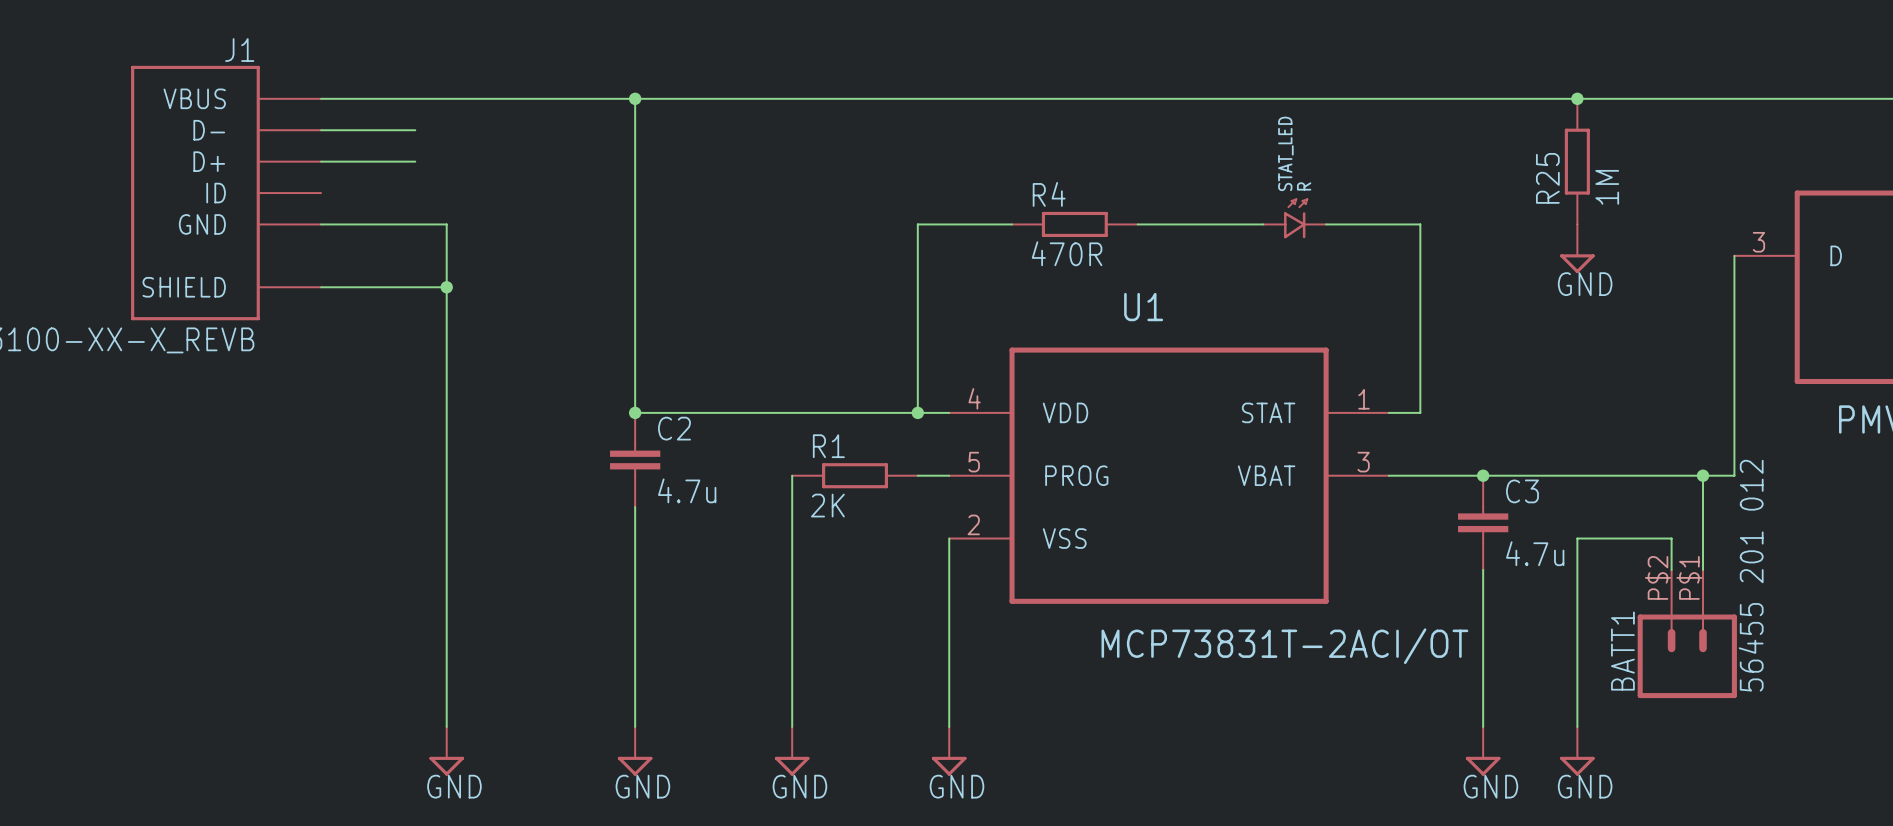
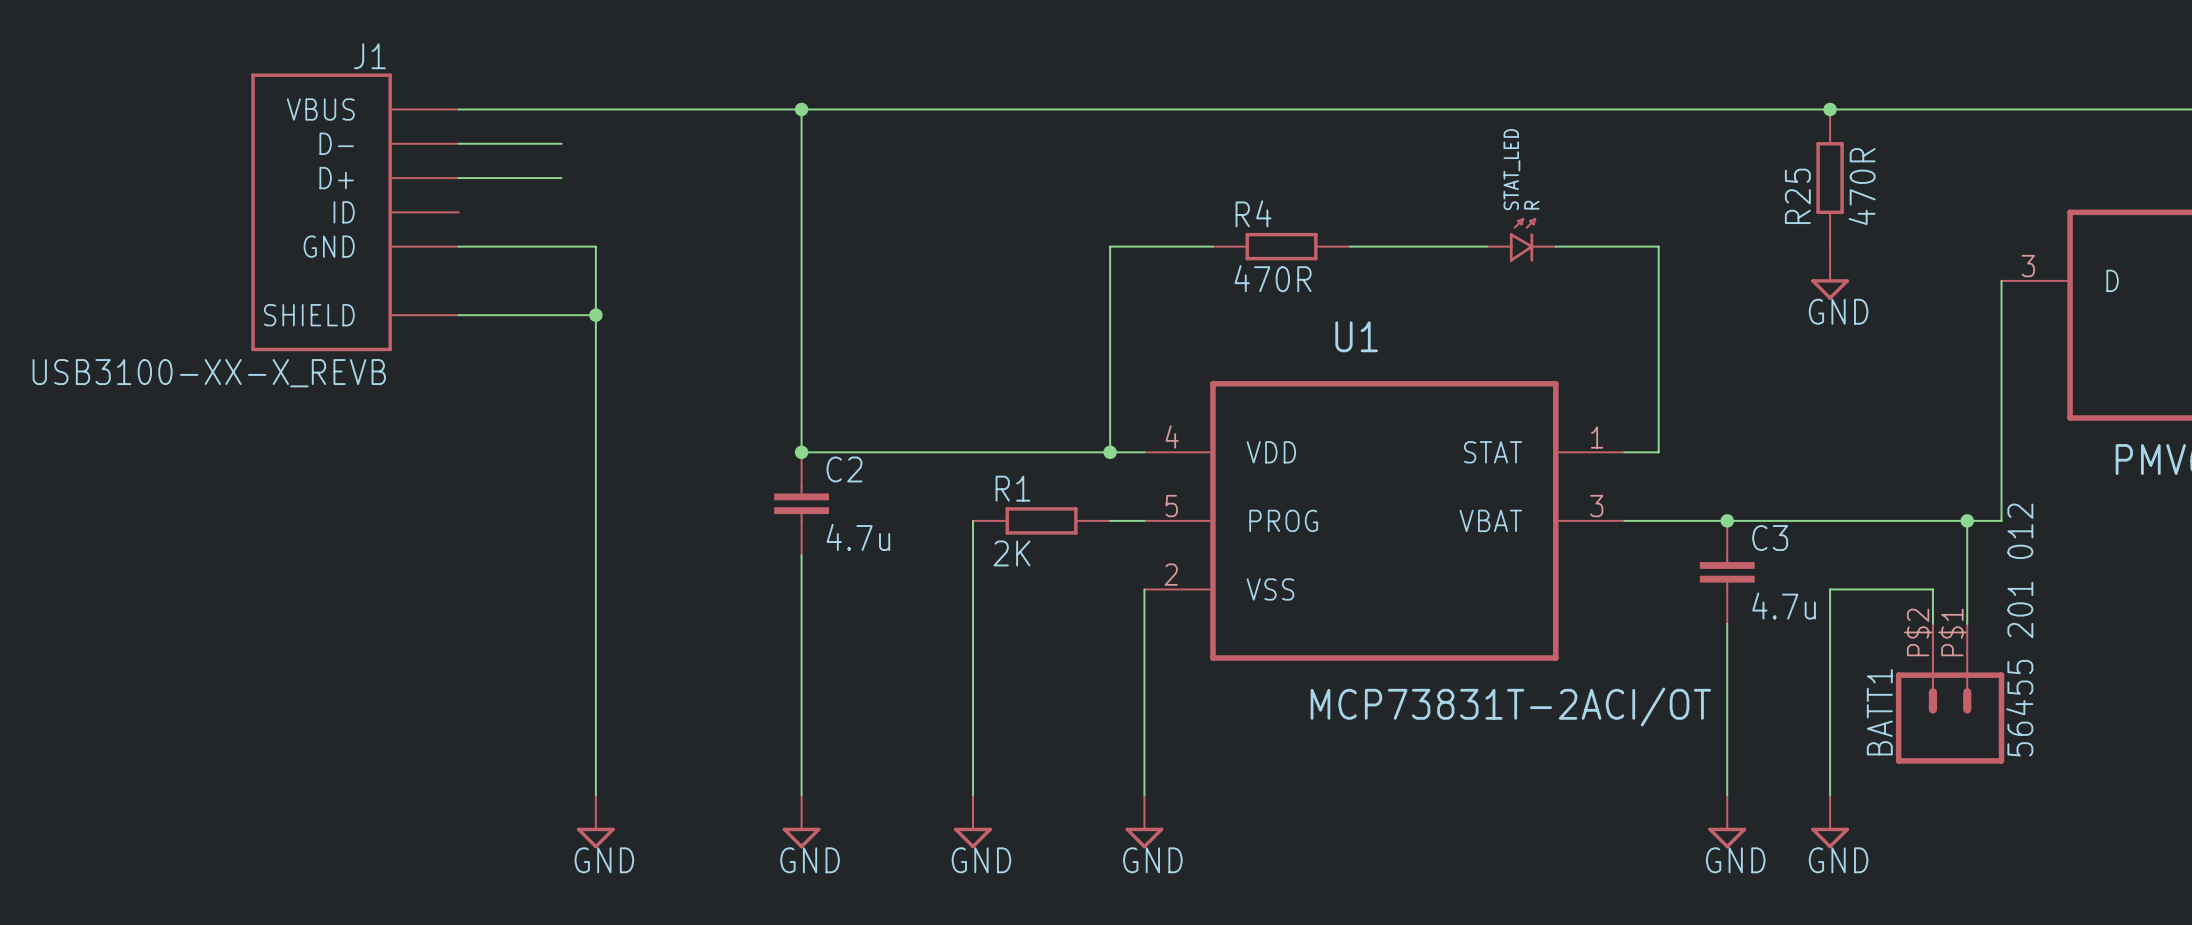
R25 value: 1M (1607, 187) -> 470R (1862, 186)

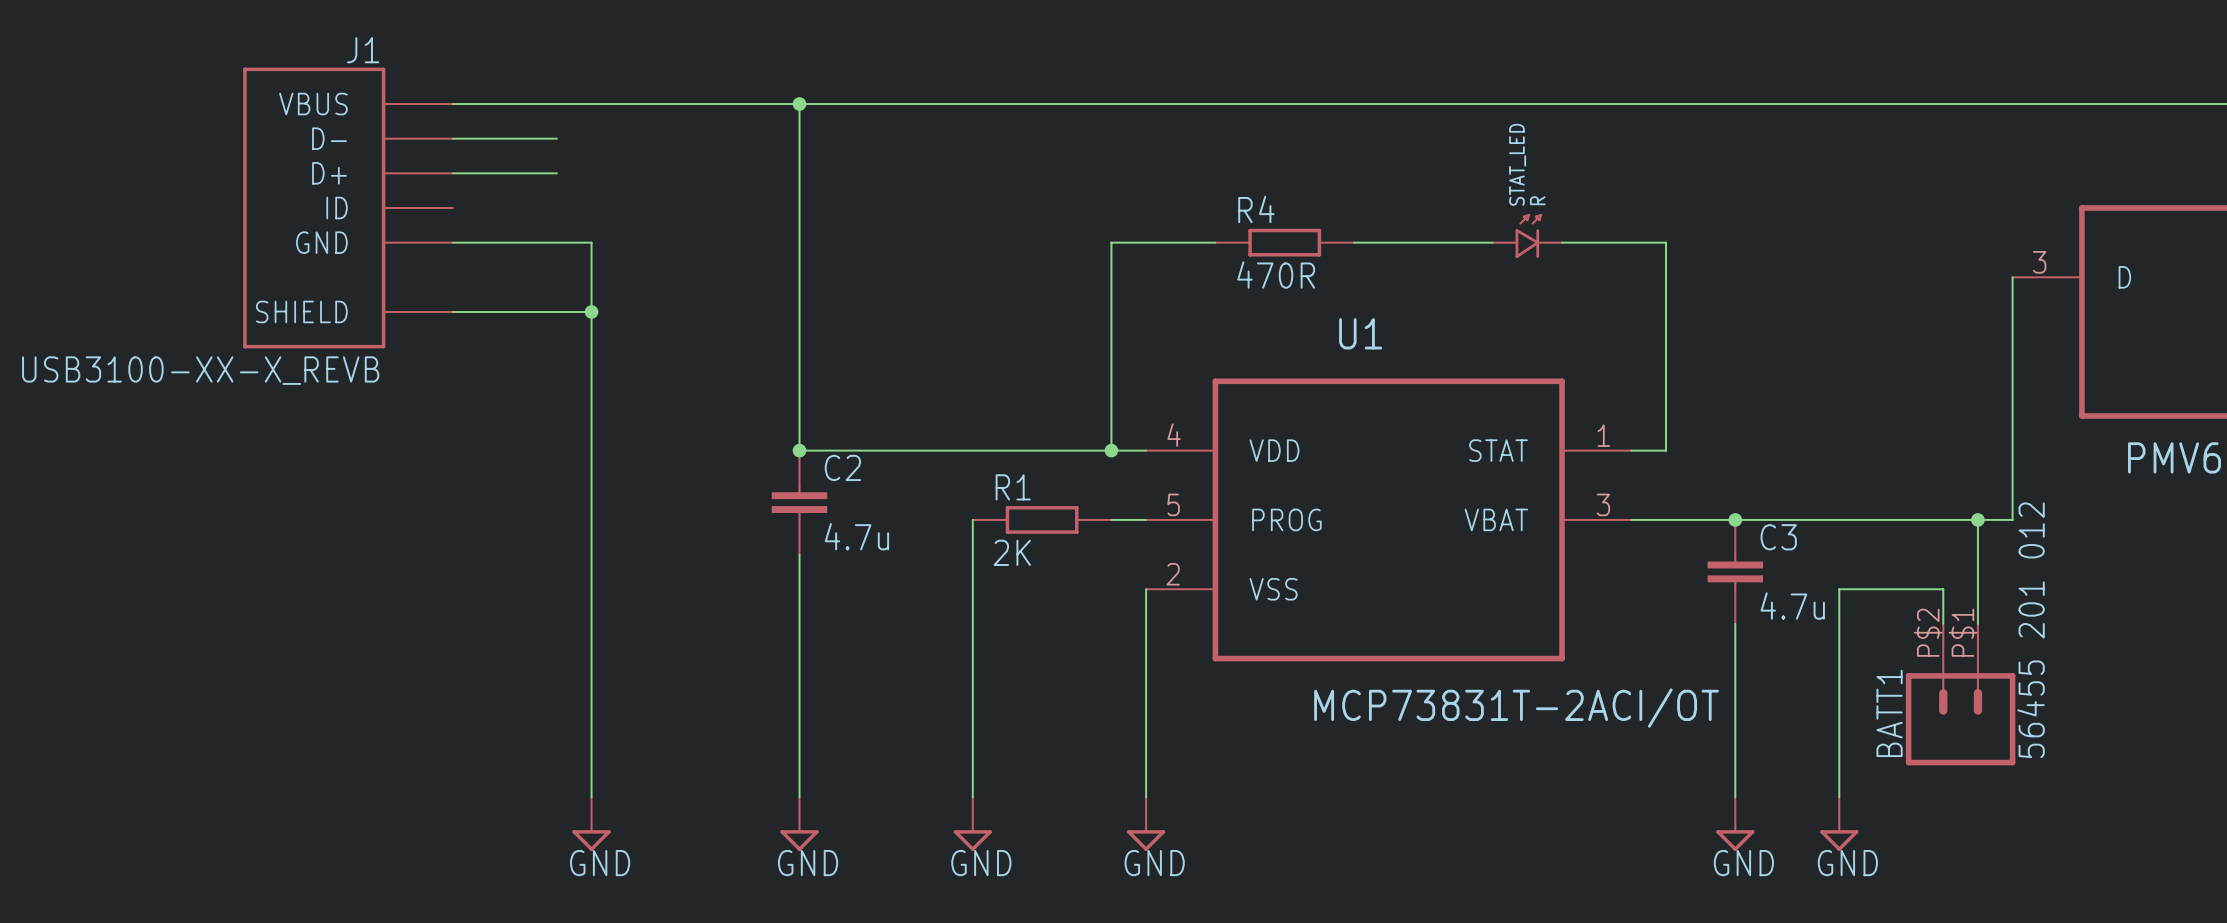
junction: (1830, 109) -> none
R25: 470R (1830, 178) -> none
power symbol: GND (1830, 273) -> none

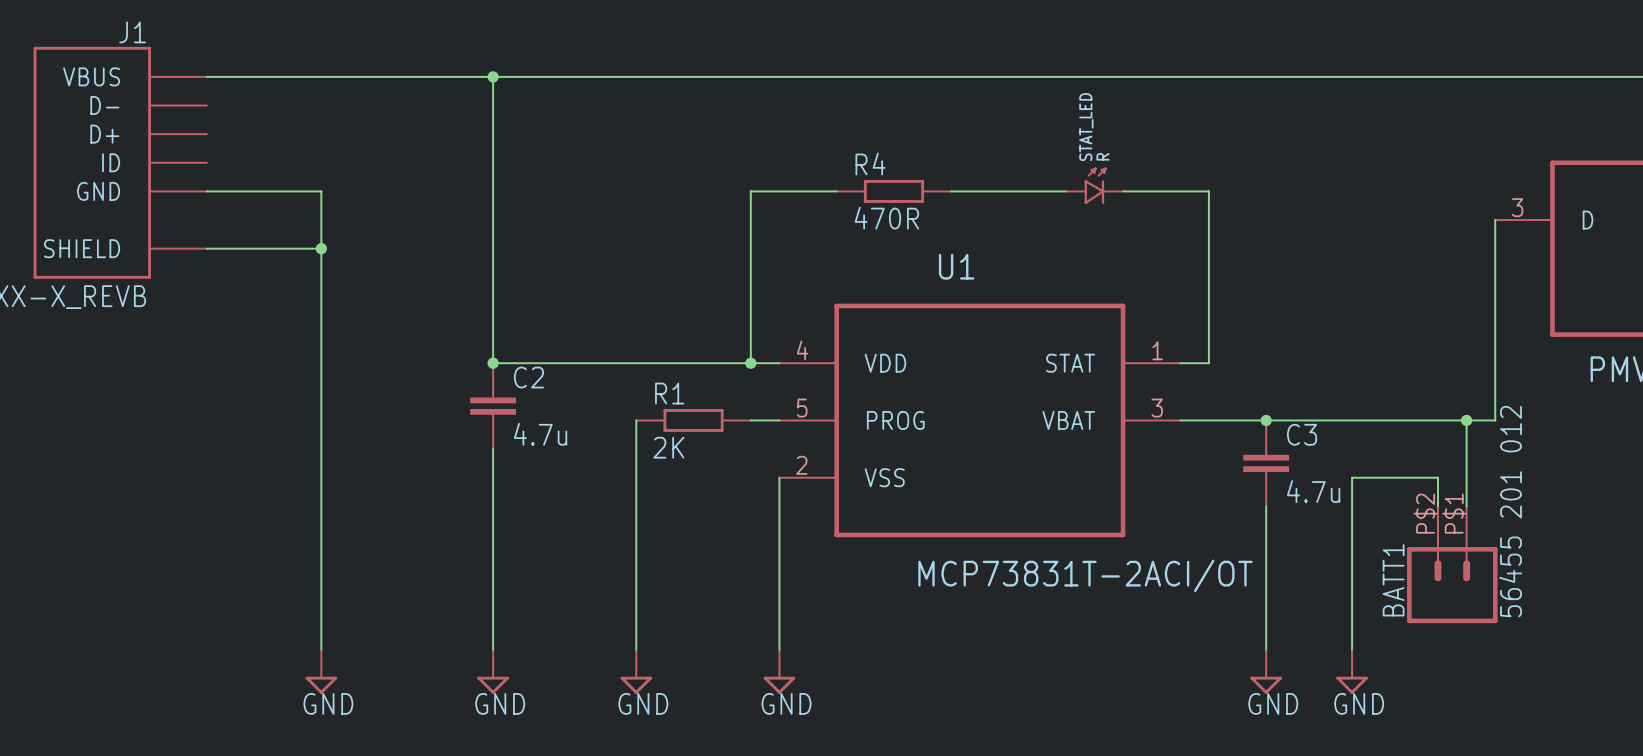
wire: (452, 138) (556, 138) -> none
wire: (452, 173) (556, 173) -> none

